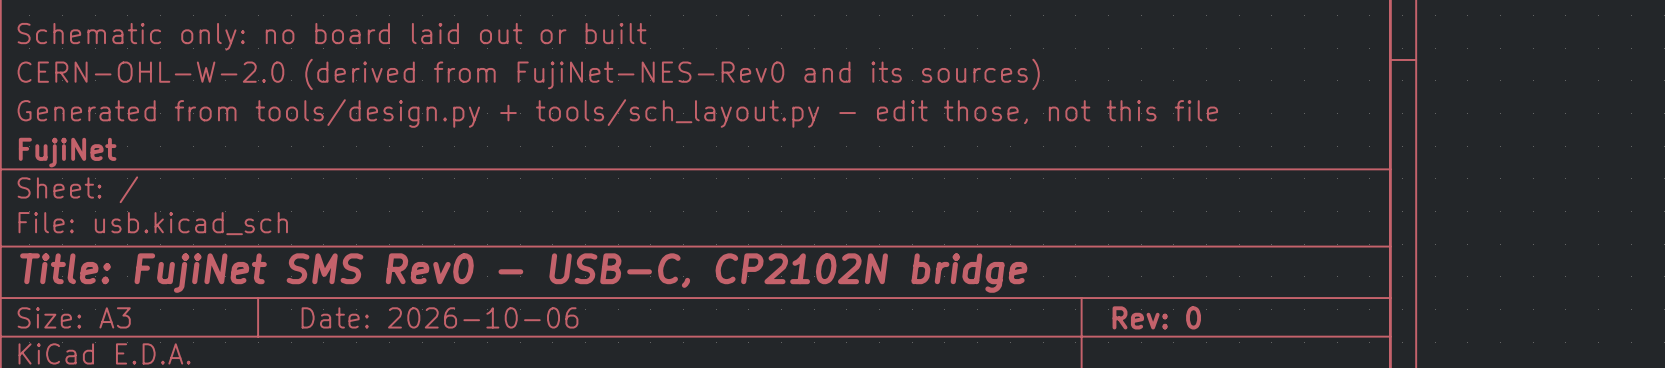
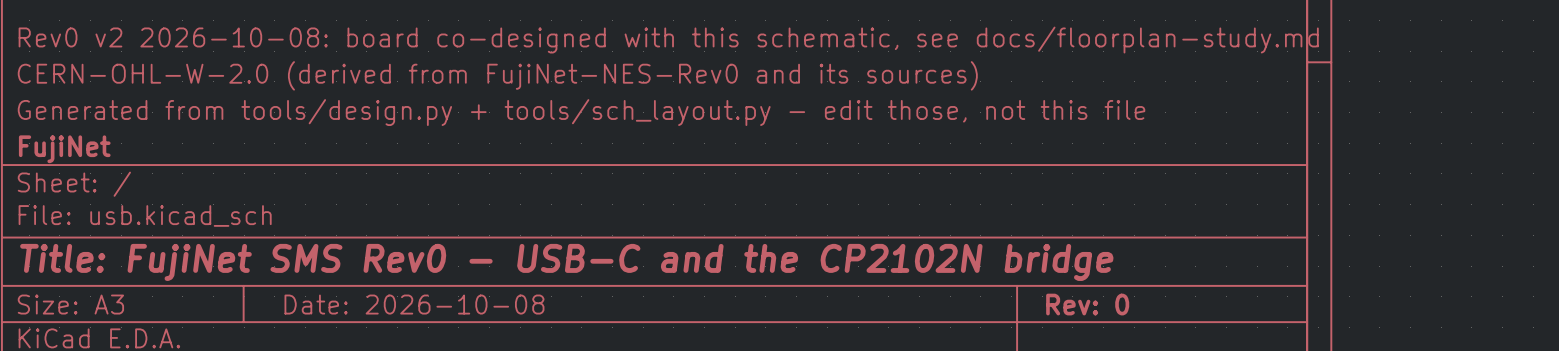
title block: Schematic only: no board laid out or built (332, 36) -> Rev0 v2 2026-10-08: board co-designed with this schematic, see docs/floorplan-study.md (668, 40)
title block: Title: FujiNet SMS Rev0 - USB-C, CP2102N bridge (523, 273) -> Title: FujiNet SMS Rev0 - USB-C and the CP2102N bridge (566, 262)
title block: Date: 2026-10-06 (440, 317) -> Date: 2026-10-08 (414, 304)

